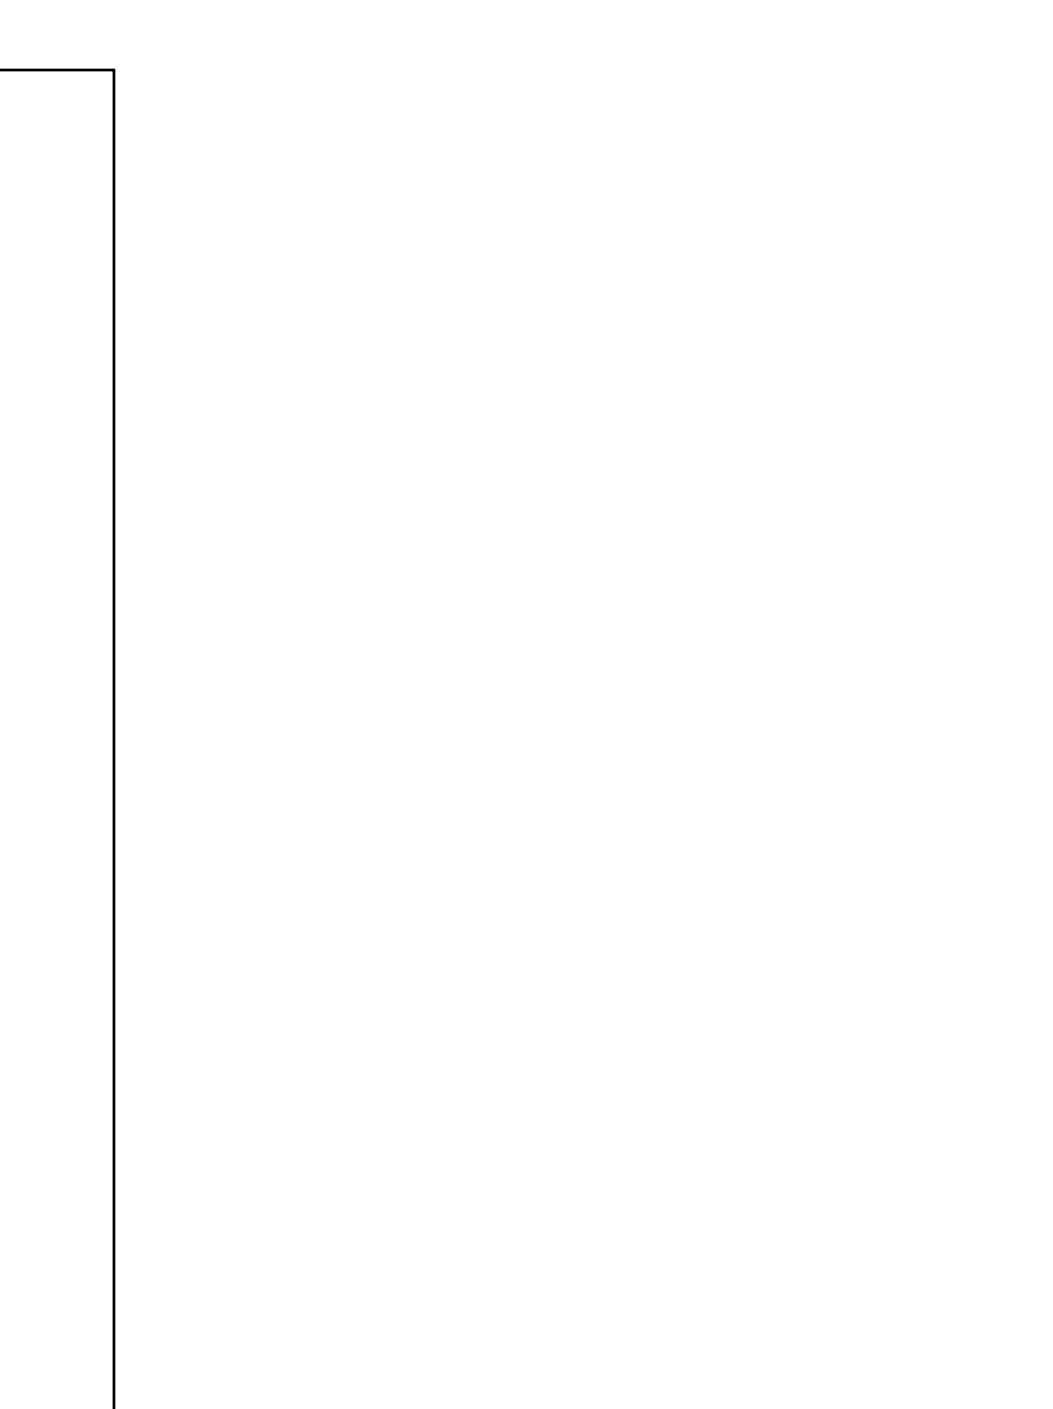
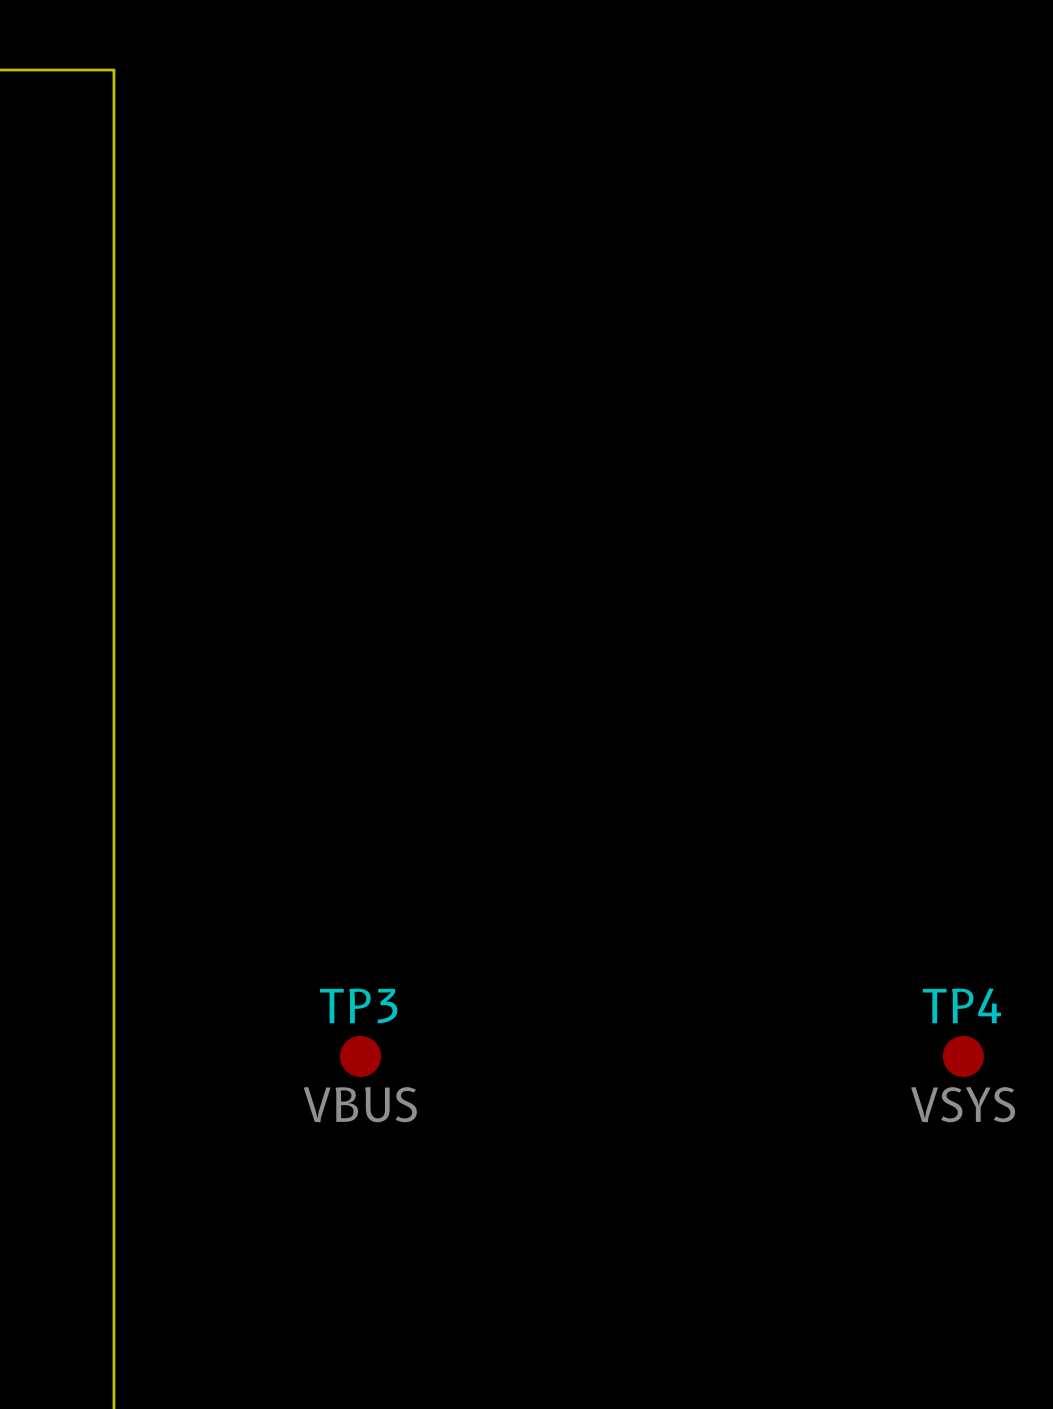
TP3: none -> VBUS (360, 1056)
TP4: none -> VSYS (963, 1056)

